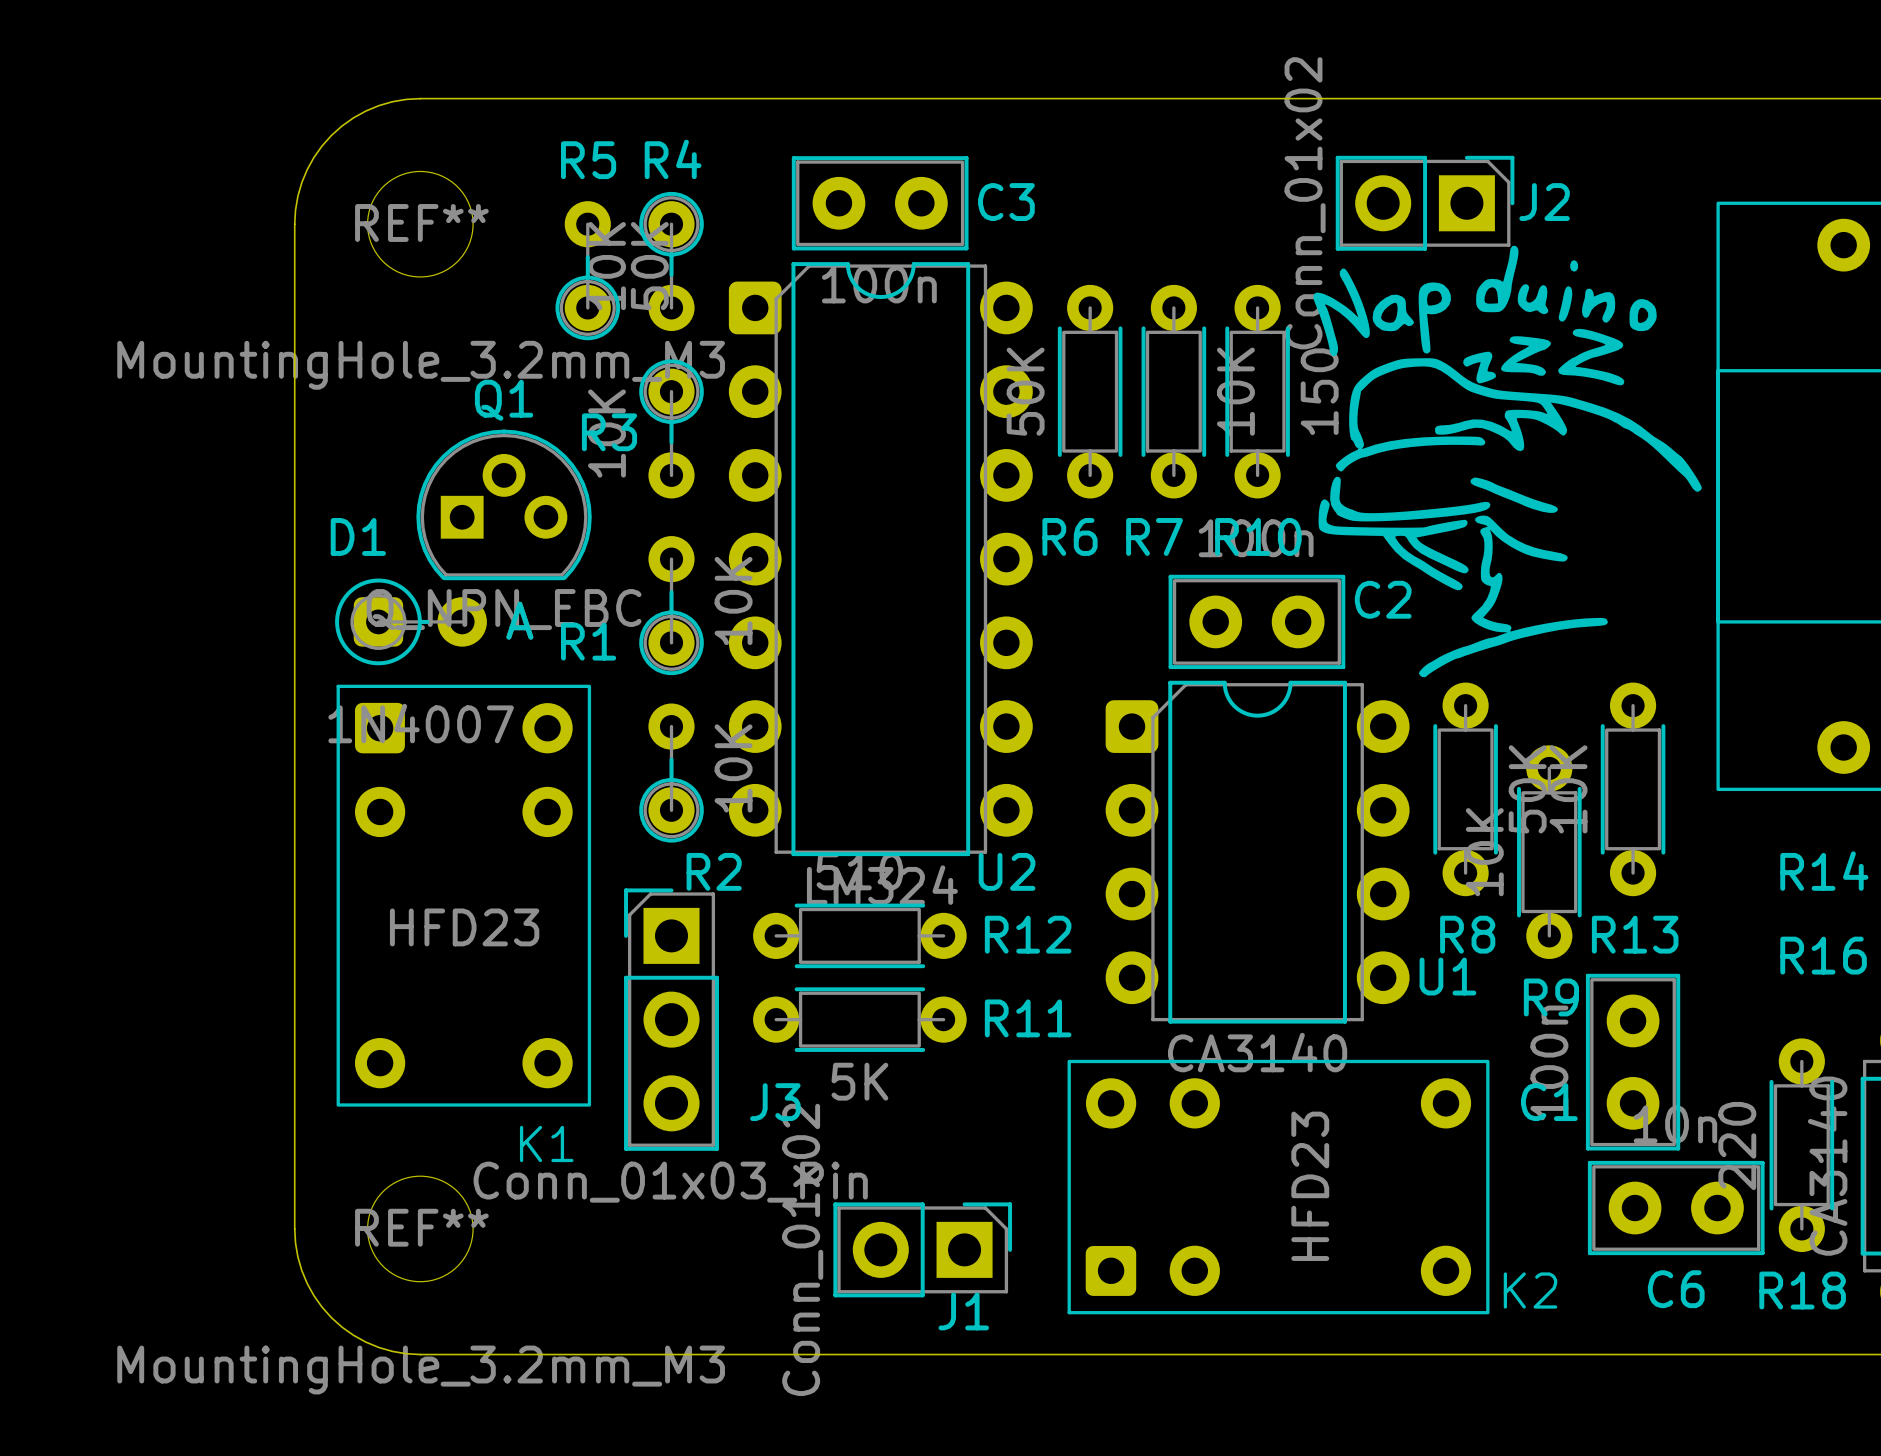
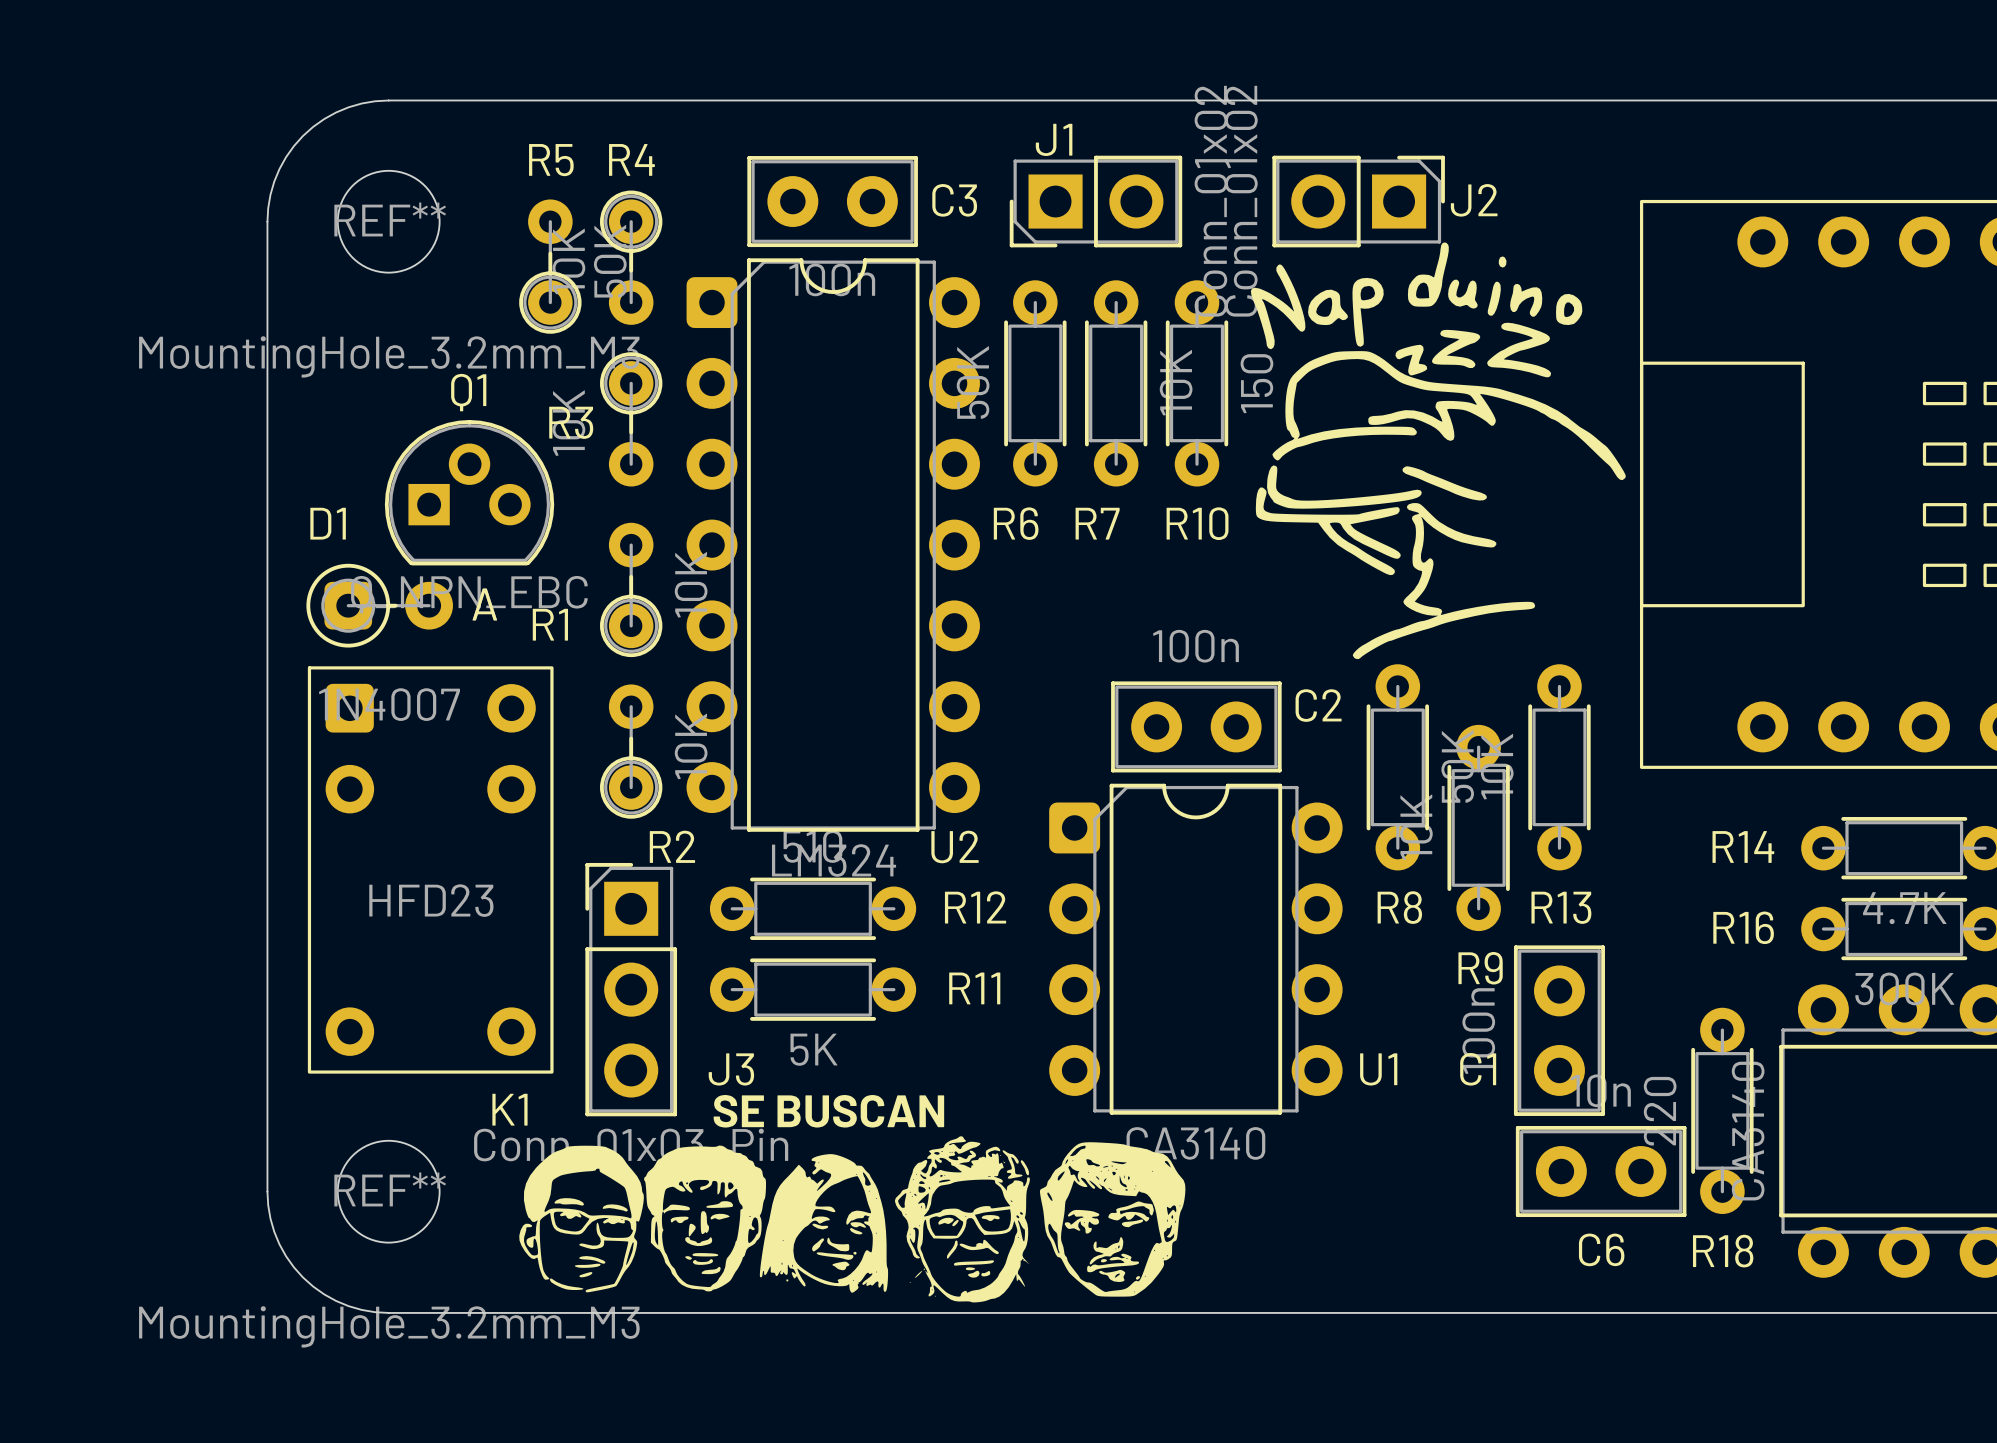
C2 position: (1256, 621) -> (1196, 726)
U1 position: (1257, 852) -> (1195, 949)
text: none -> SE BUSCAN (828, 1111)
drawing: none -> [519, 1136, 1186, 1303]
K2: HFD23 (1278, 1187) -> none
J1 rotation: 0° (922, 1249) -> 180° (1095, 201)
J1 position: (922, 1249) -> (1095, 201)

